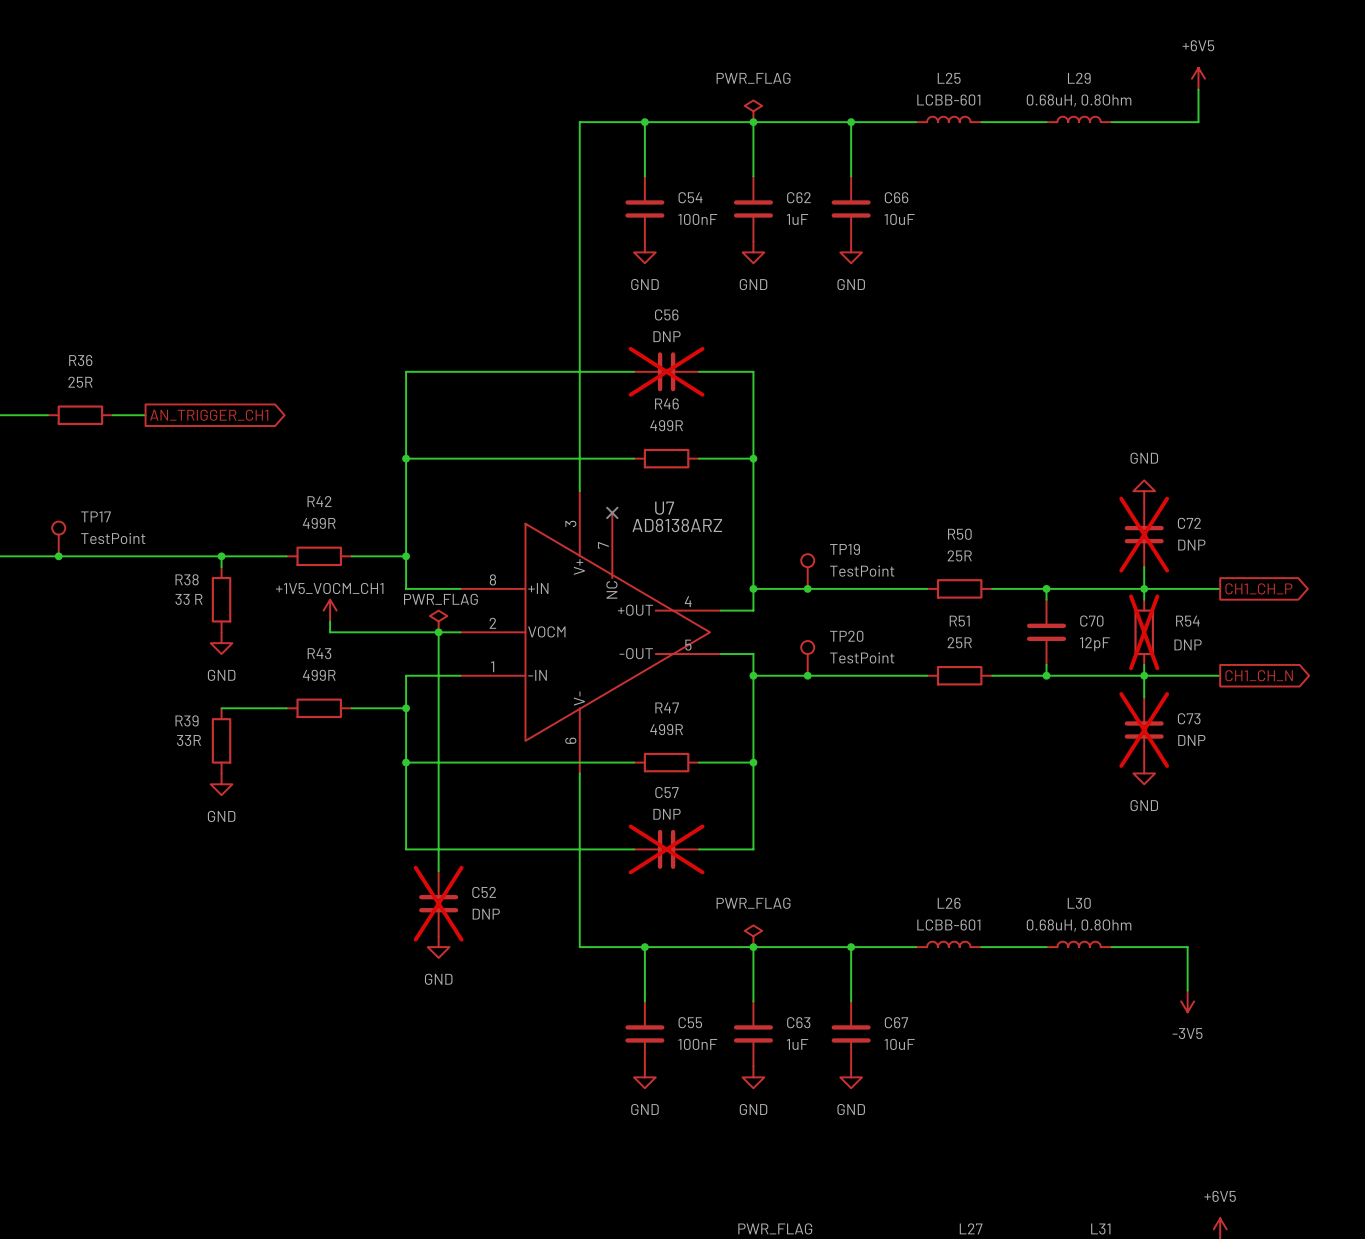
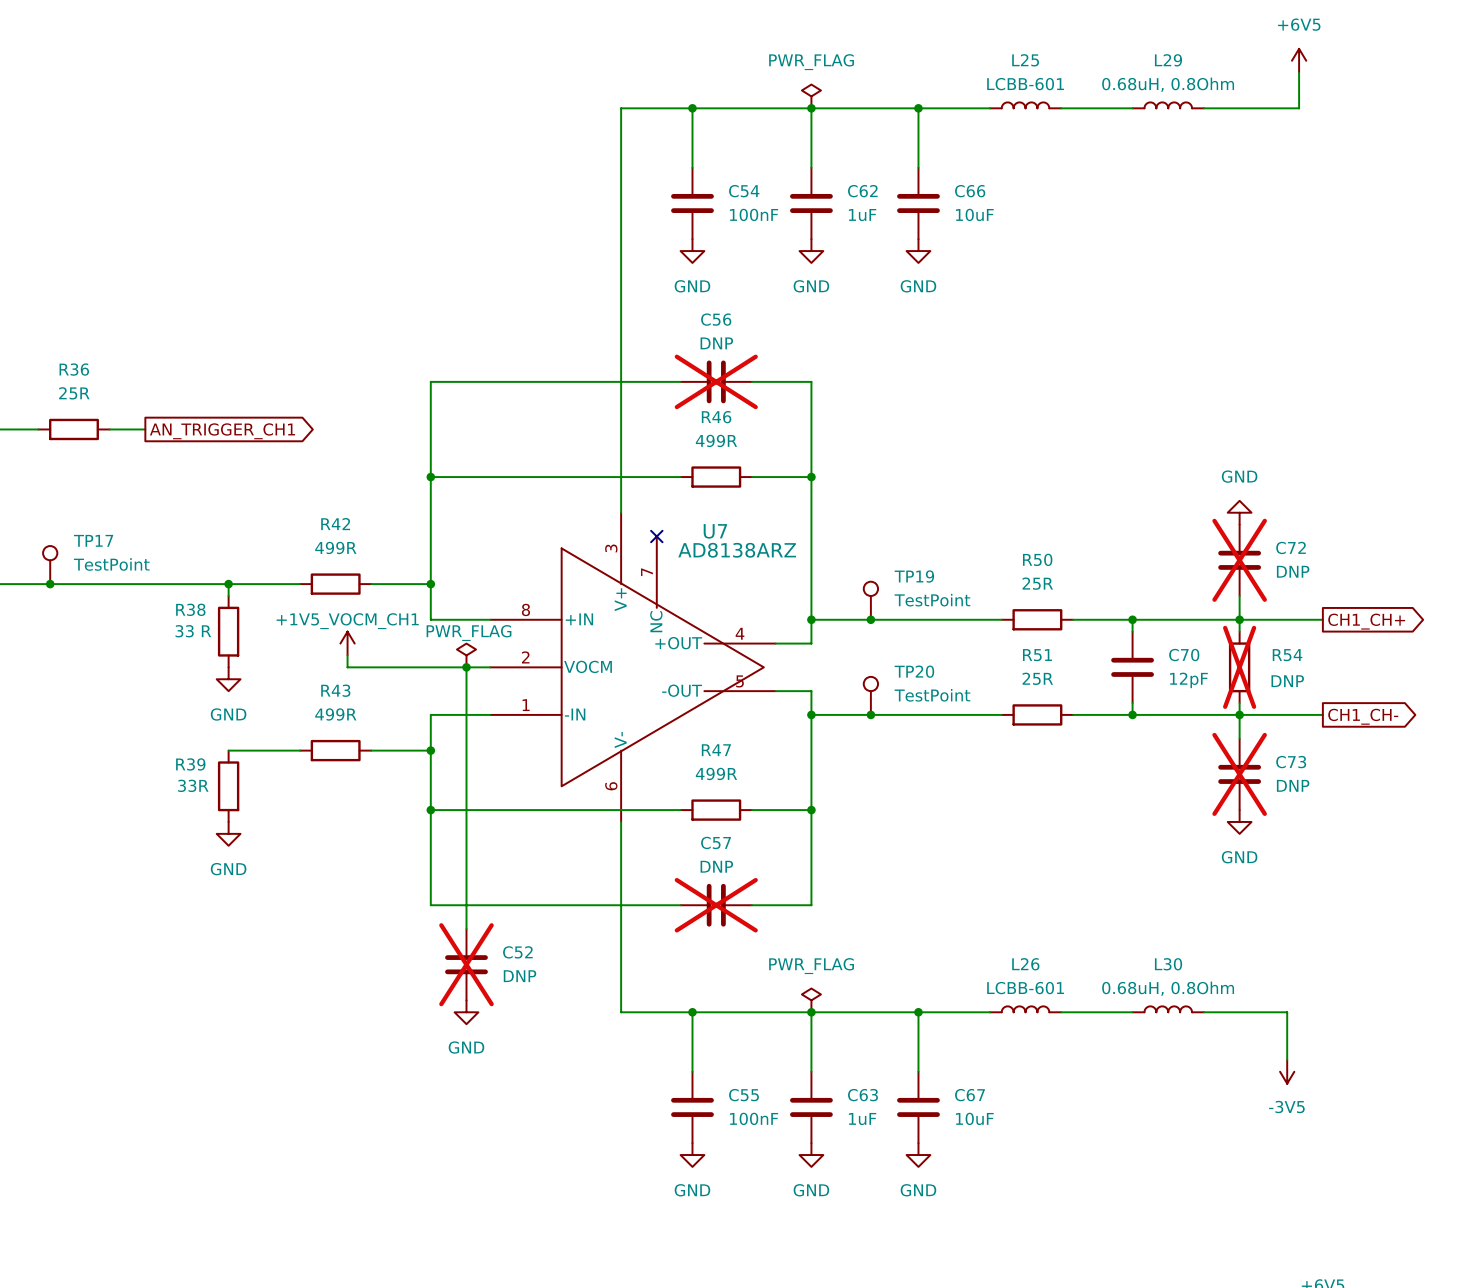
global label: CH1_CH_P (1258, 588) -> CH1_CH+ (1366, 621)
global label: CH1_CH_N (1259, 675) -> CH1_CH- (1363, 716)

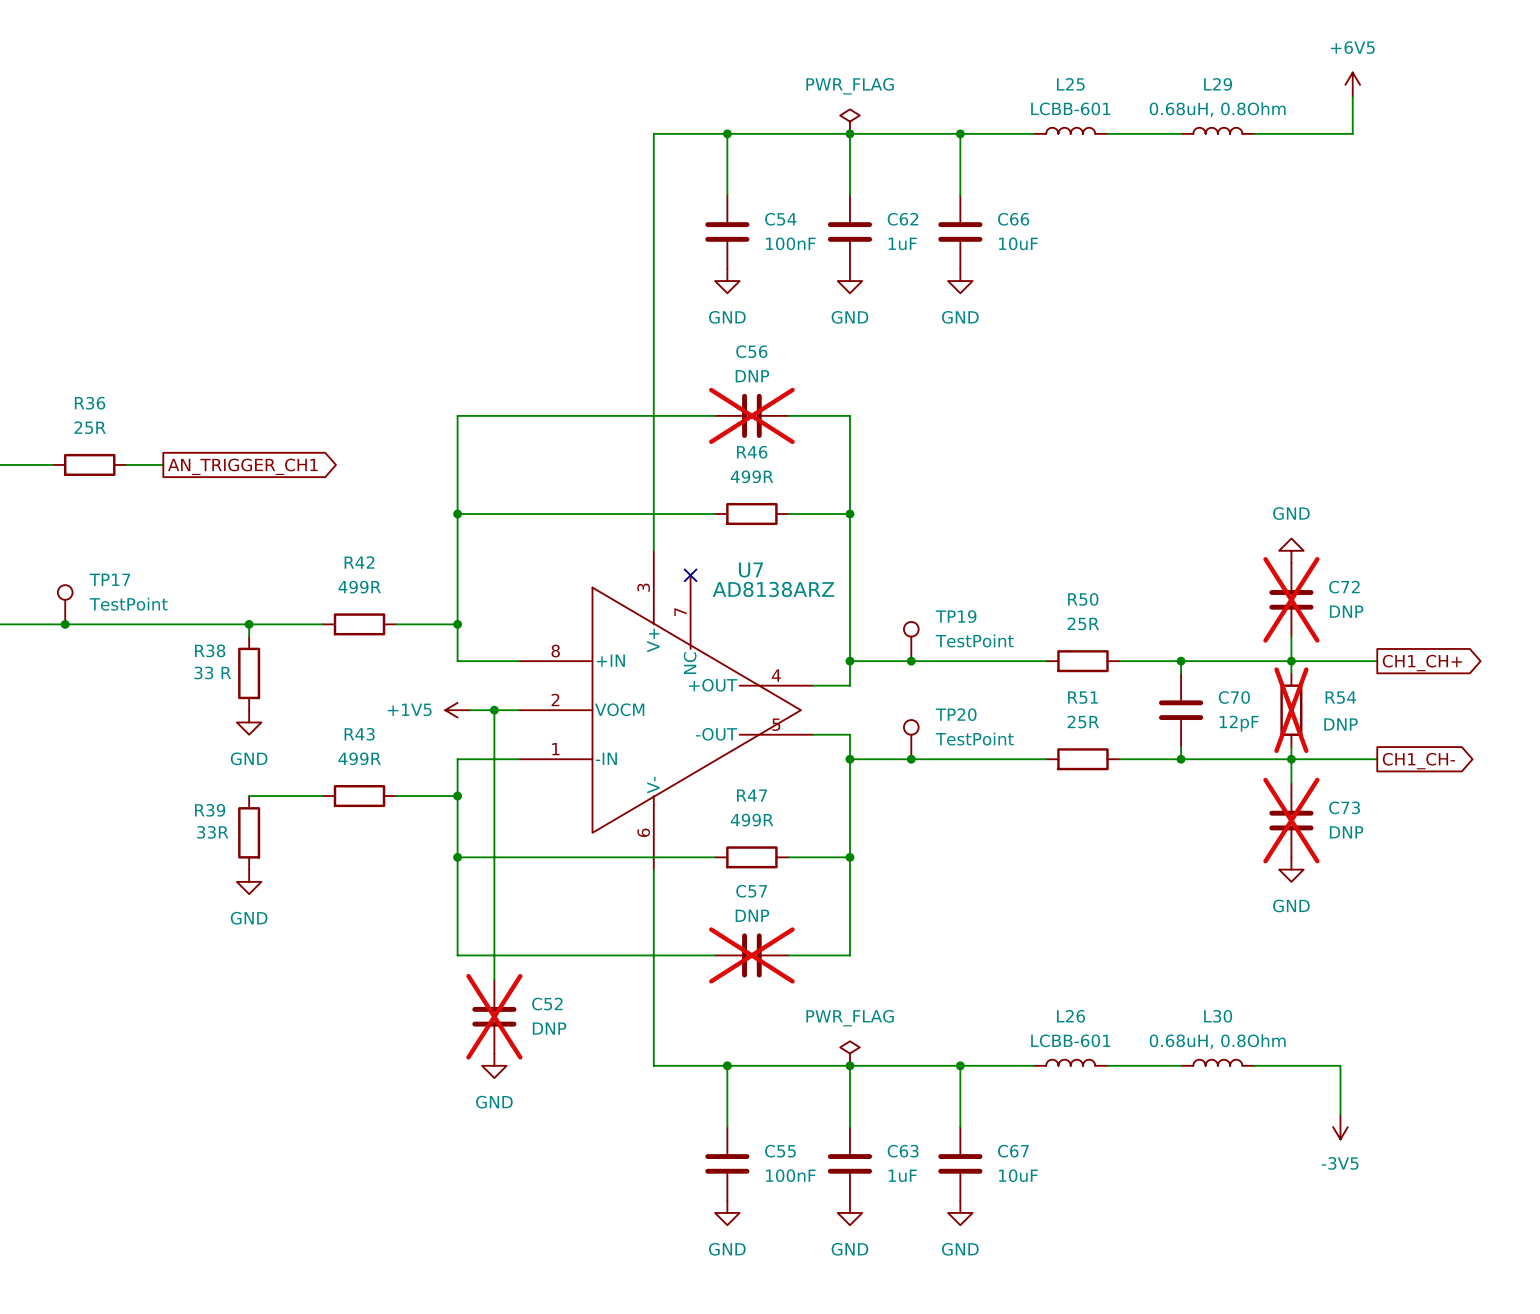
power symbol: +1V5_VOCM_CH1 (347, 643) -> none
wire: (347, 655) (347, 667) (442, 667) -> none
power symbol: PWR_FLAG (466, 655) -> none
power symbol: none -> +1V5 (457, 710)

